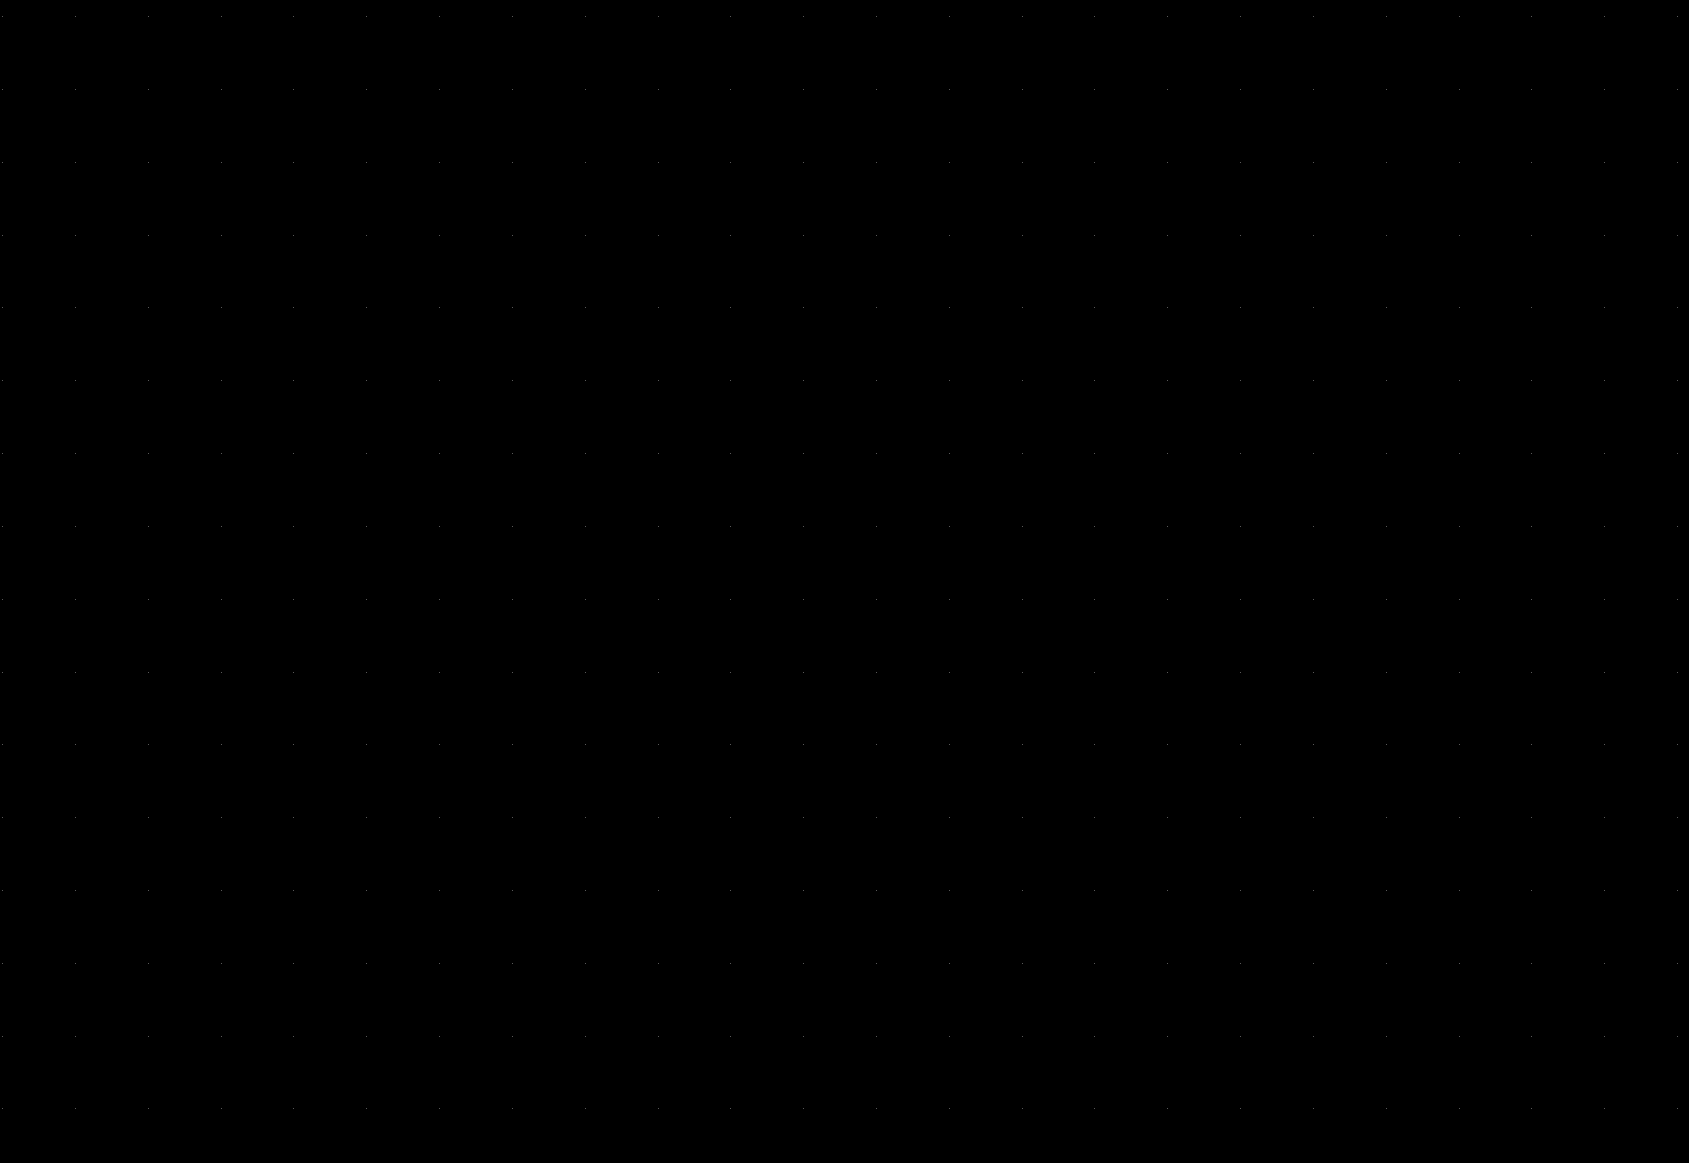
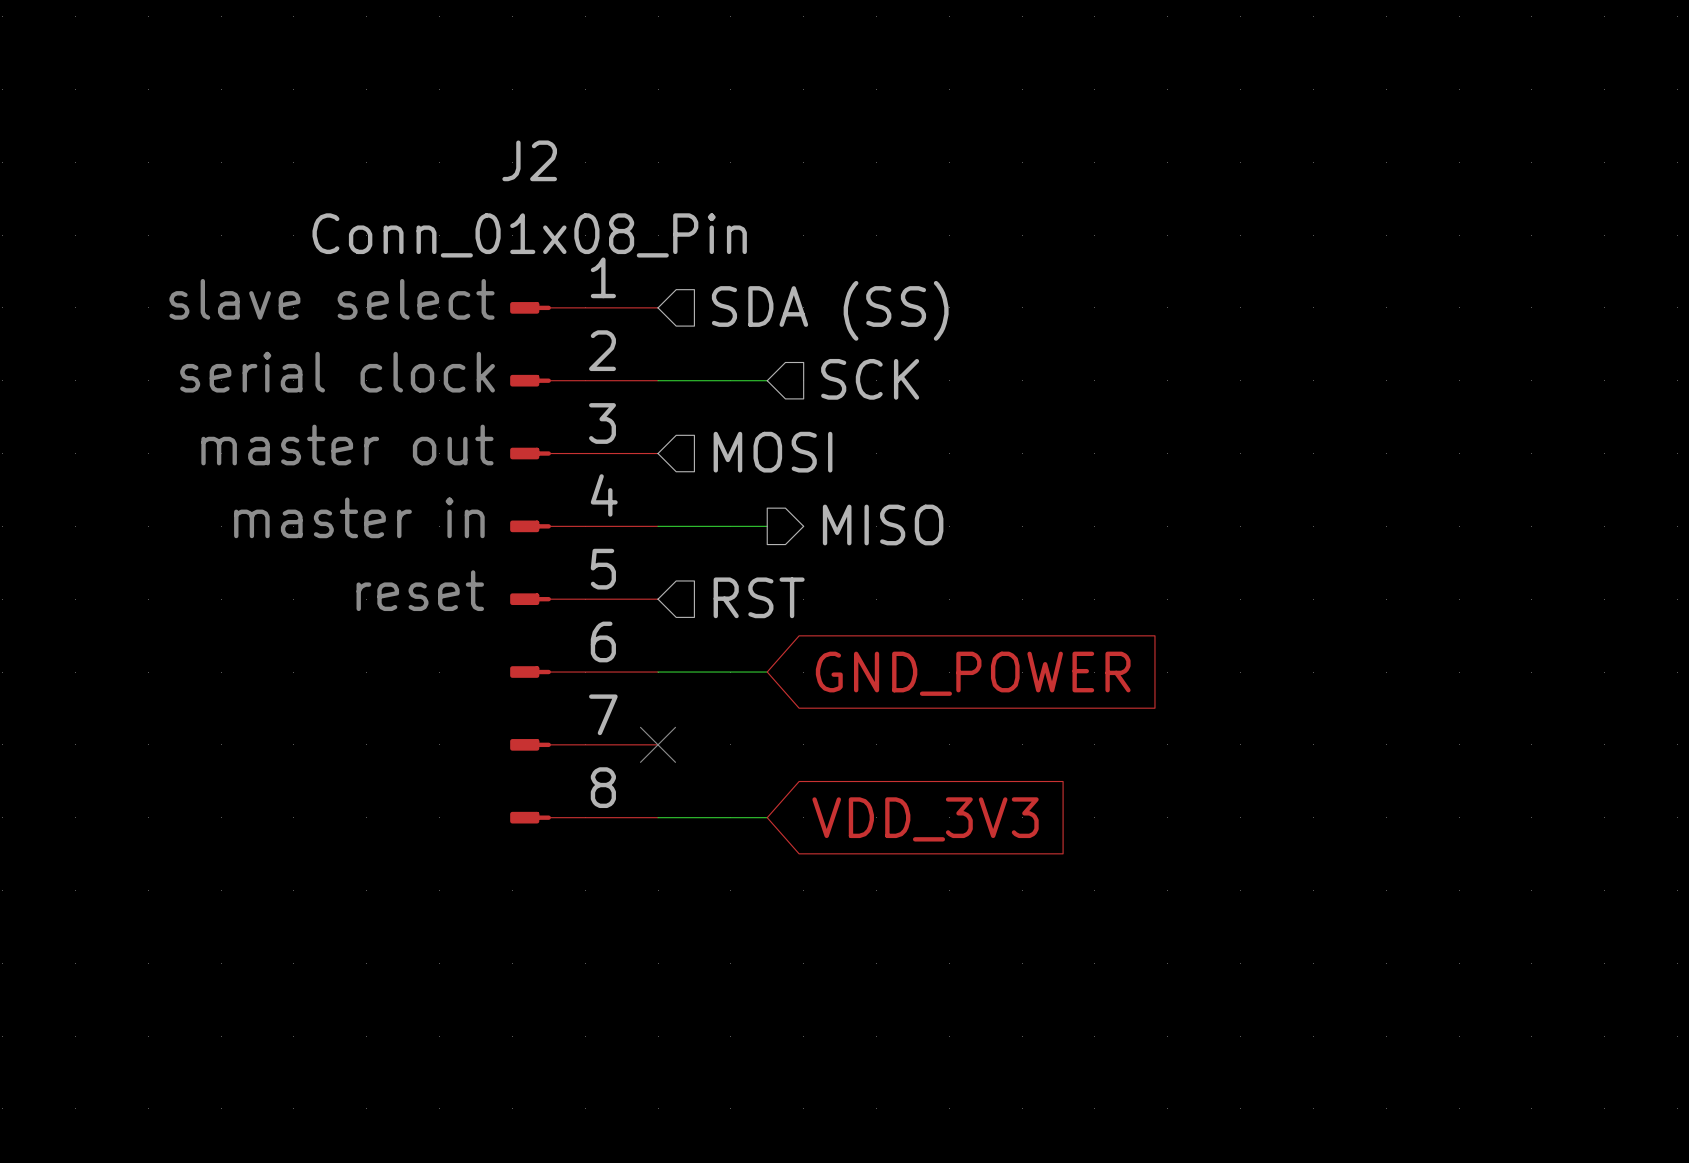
text: none -> slave select (332, 299)
hierarchical label: none -> SDA (SS) (830, 310)
text: none -> serial clock (337, 372)
hierarchical label: none -> SCK (870, 379)
wire: none -> (658, 380) (767, 380)
text: none -> master out (347, 445)
hierarchical label: none -> MOSI (773, 452)
text: none -> master in (359, 517)
hierarchical label: none -> MISO (883, 525)
wire: none -> (658, 526) (767, 526)
J2: none -> Conn_01x08_Pin (584, 562)
text: none -> reset (420, 590)
hierarchical label: none -> RST (759, 597)
wire: none -> (658, 672) (767, 672)
global label: none -> GND_POWER (973, 673)
no-connect mark: none -> (658, 744)
wire: none -> (658, 817) (767, 817)
global label: none -> VDD_3V3 (925, 819)

